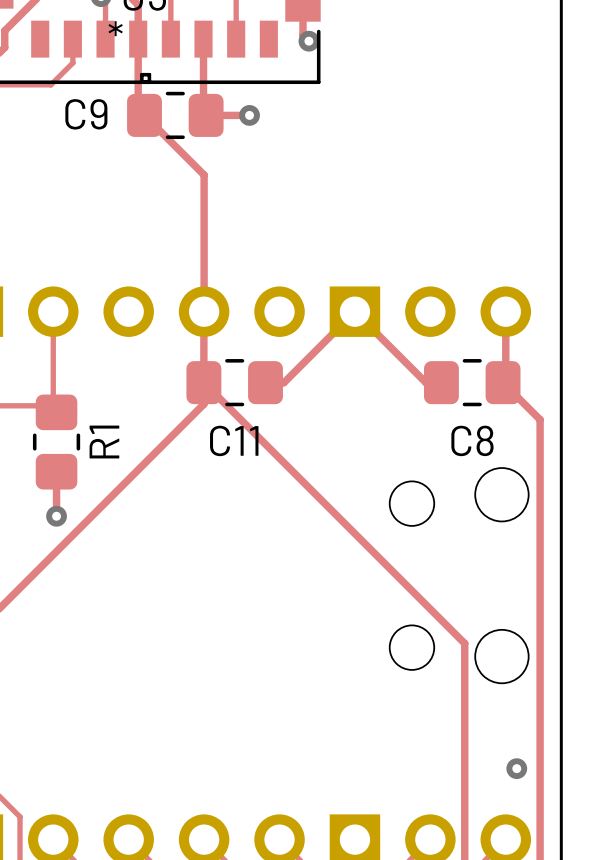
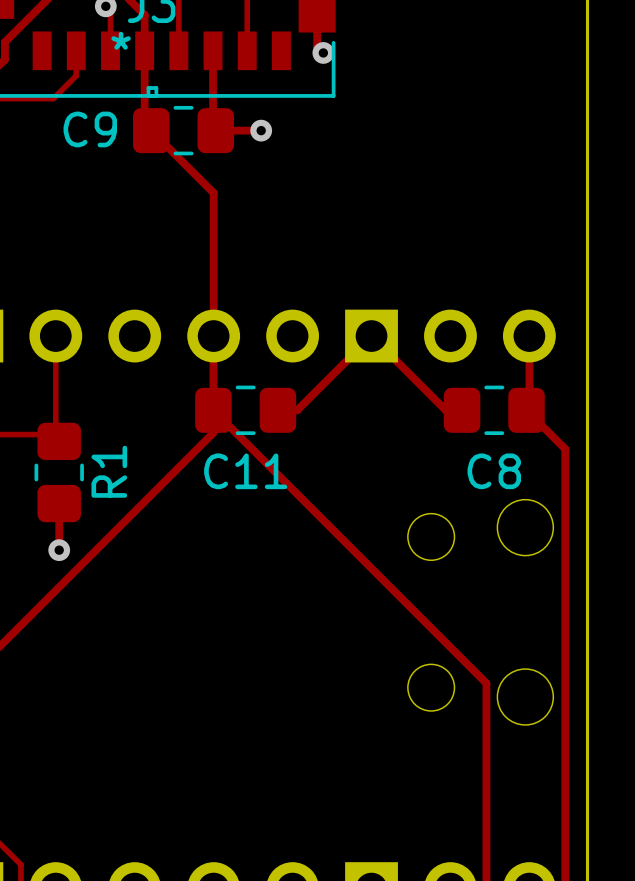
via: (516, 768) -> none

